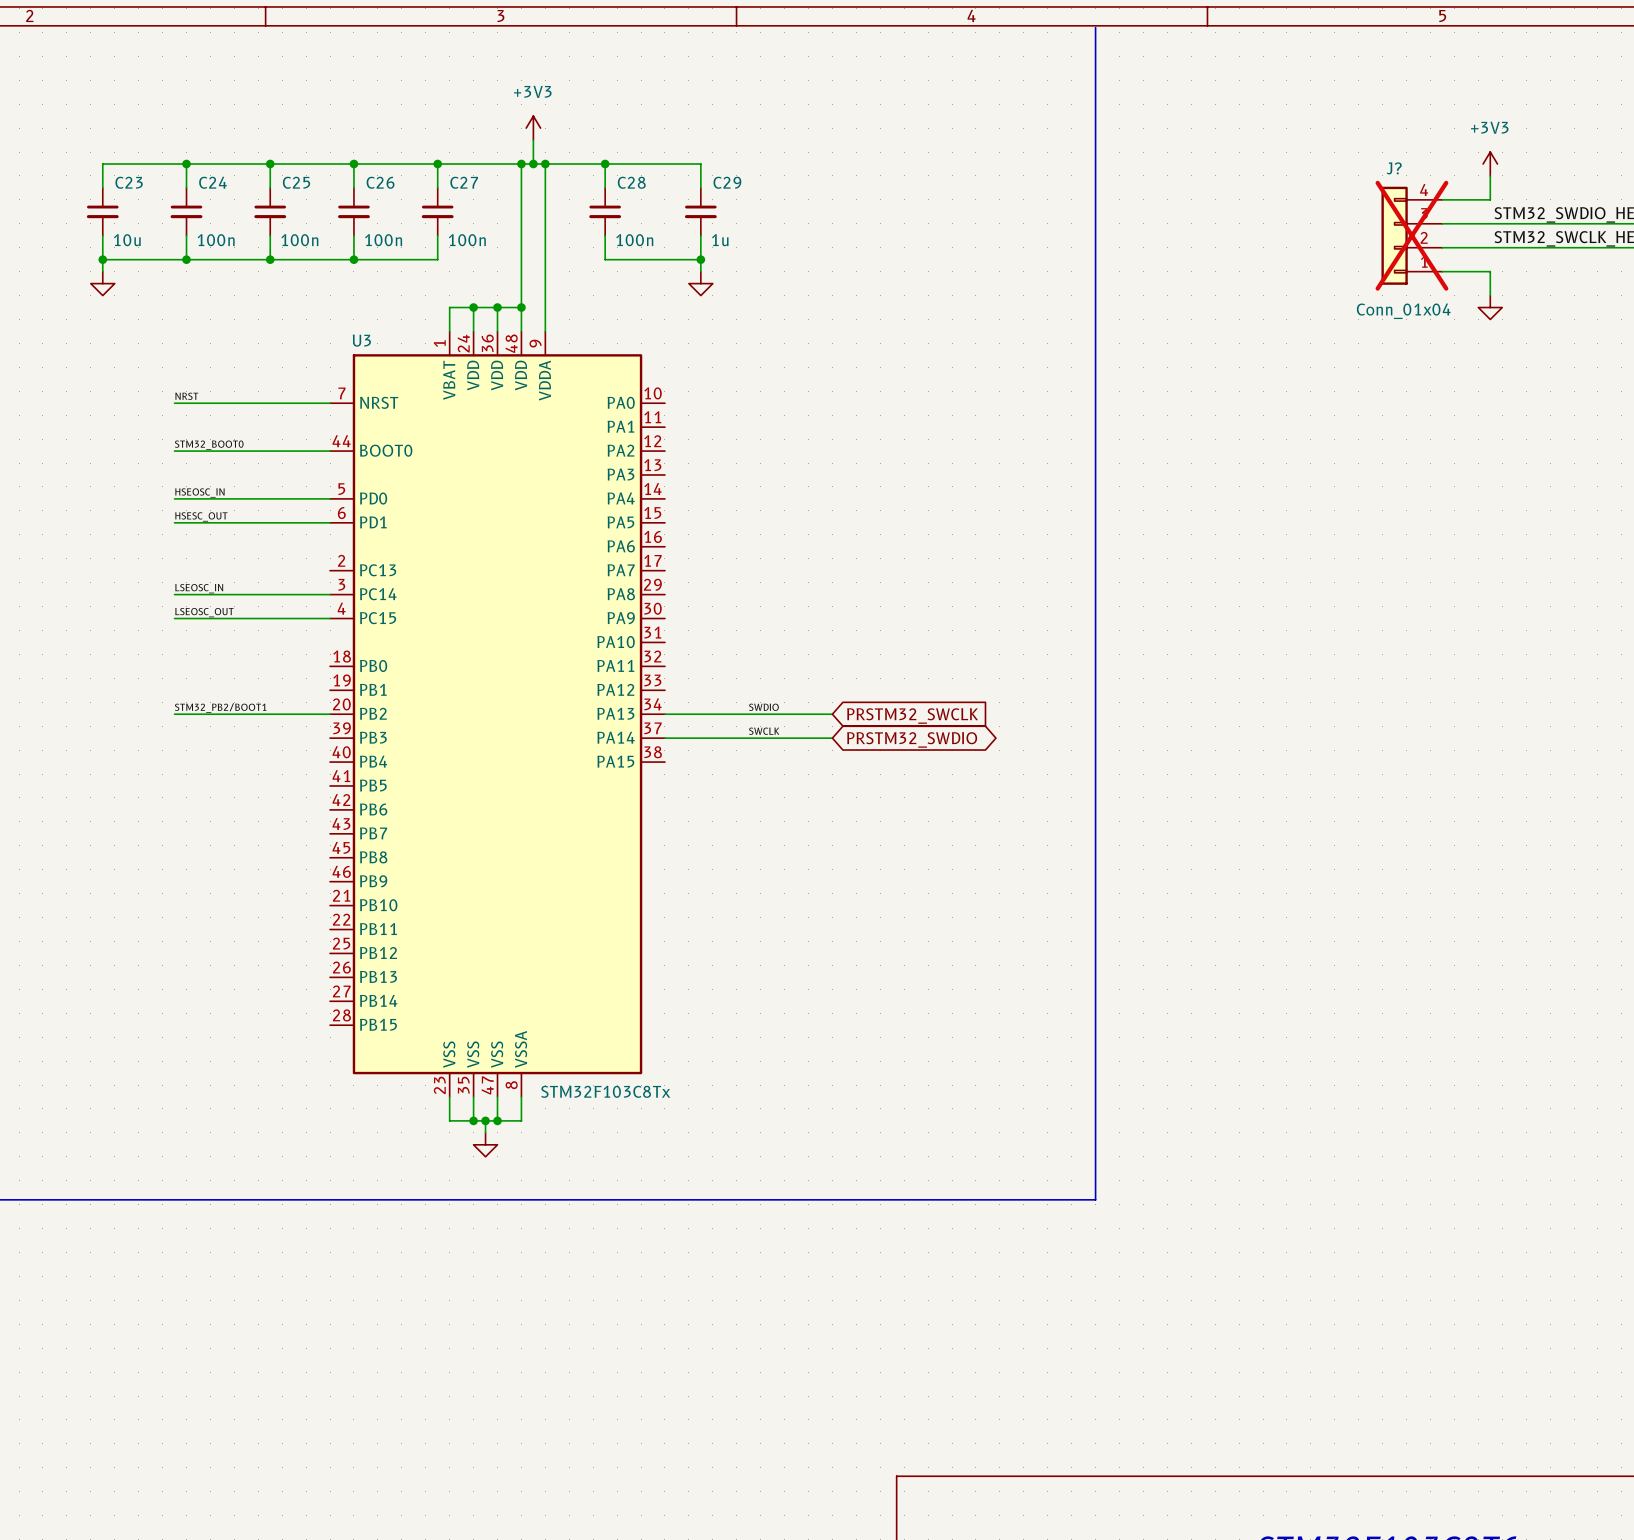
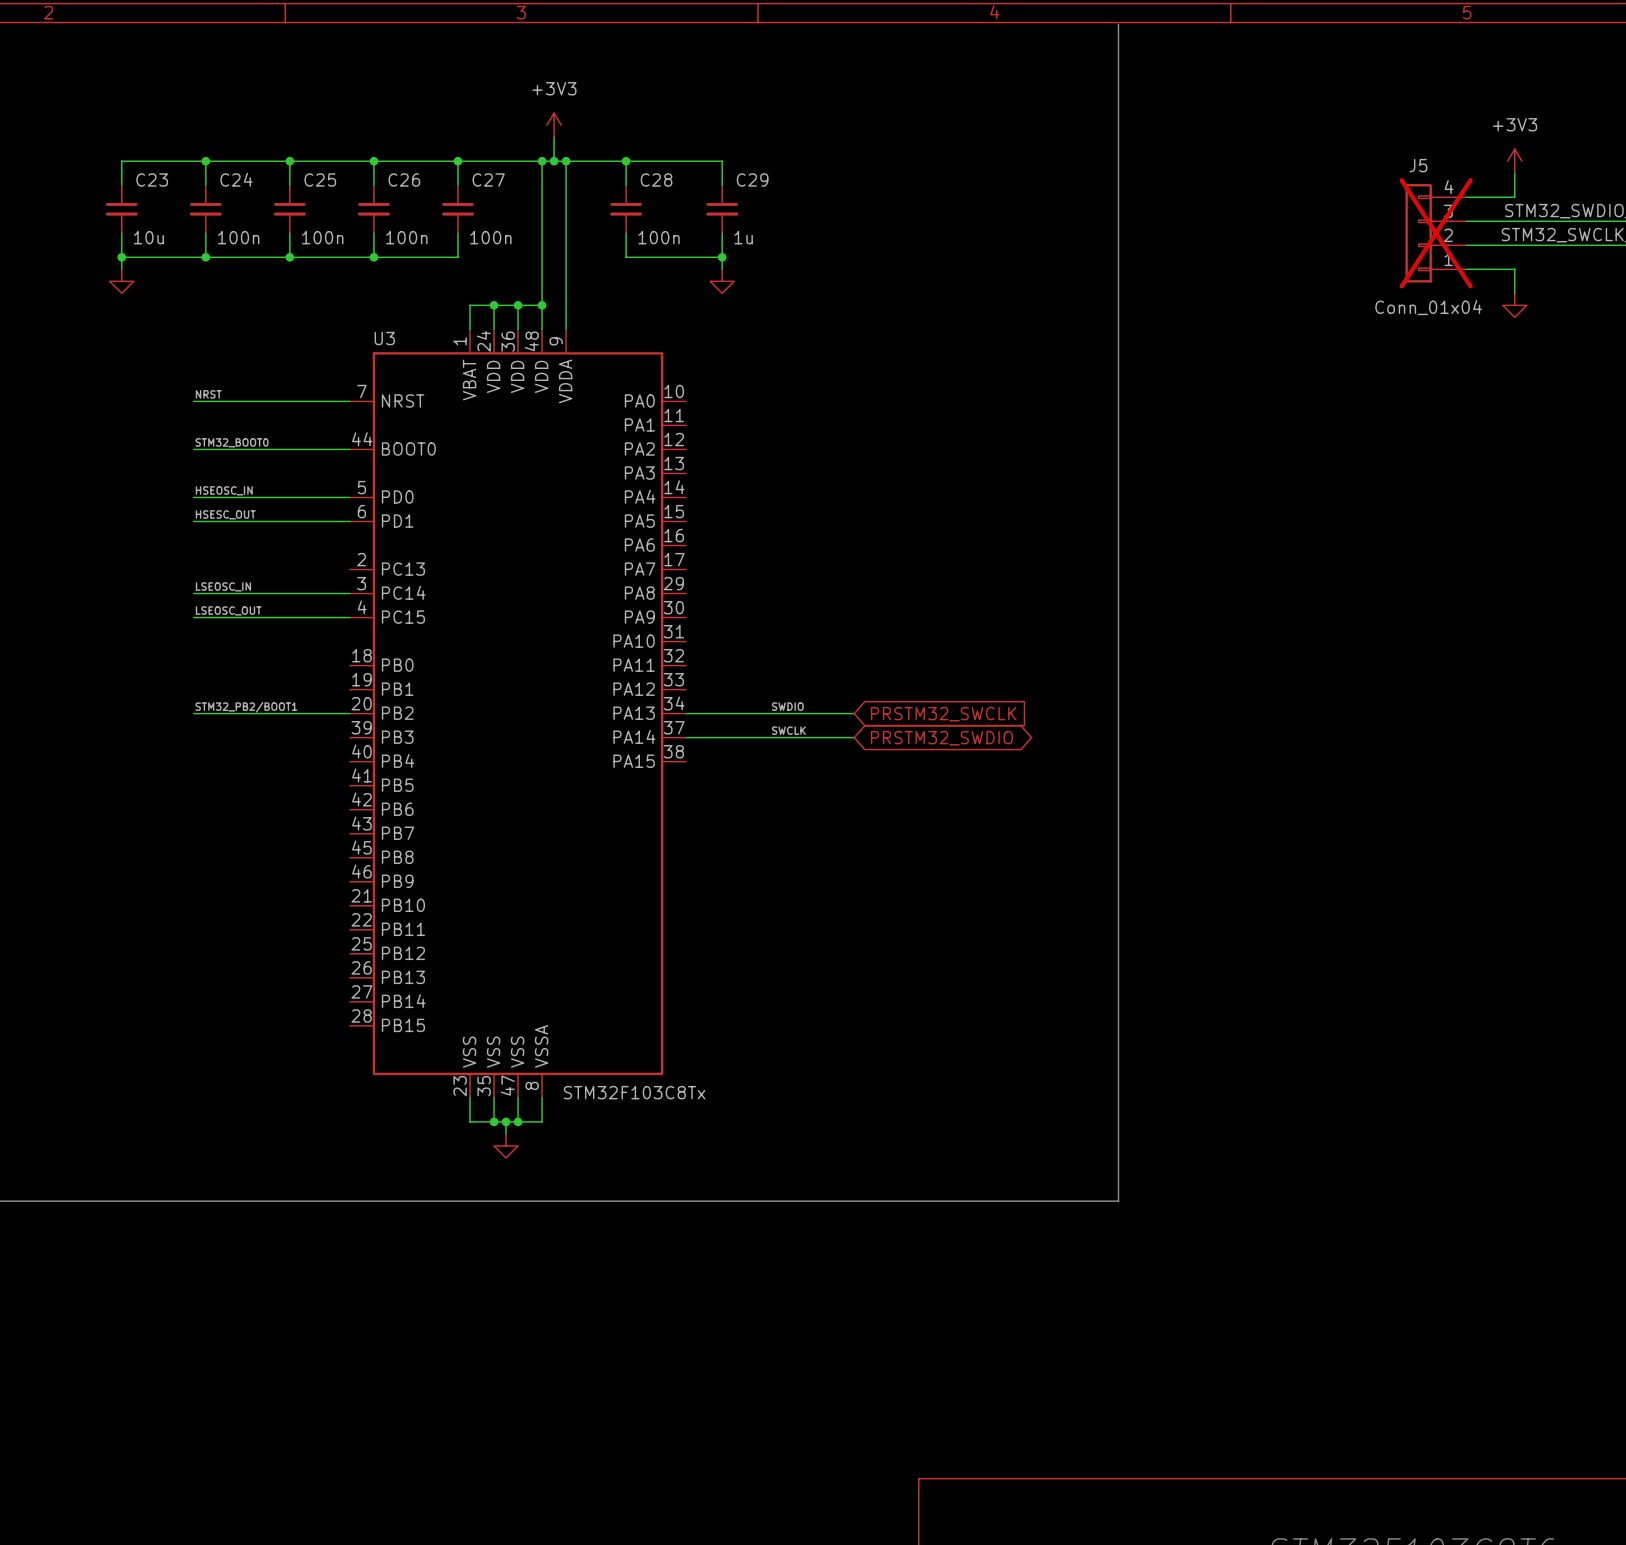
J? name: J? (1394, 168) -> J5 (1418, 165)

